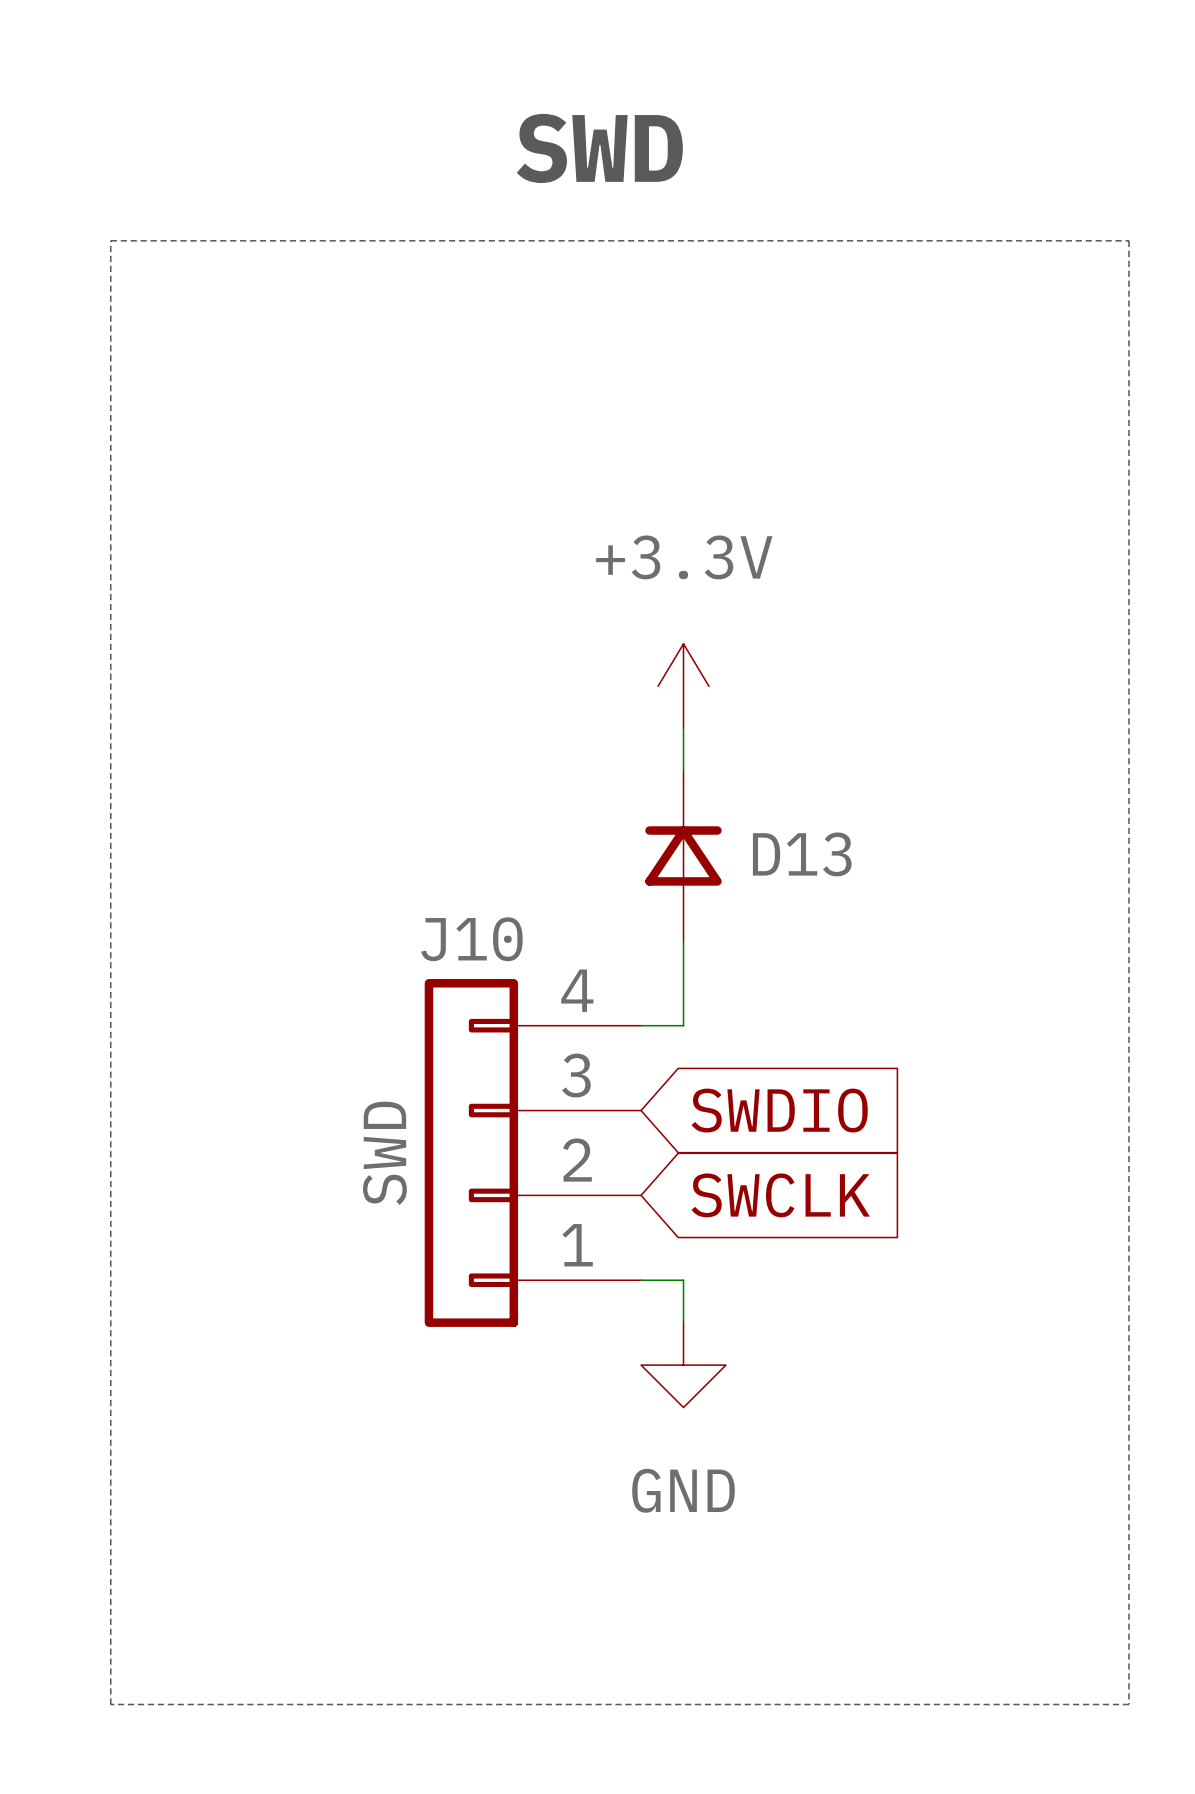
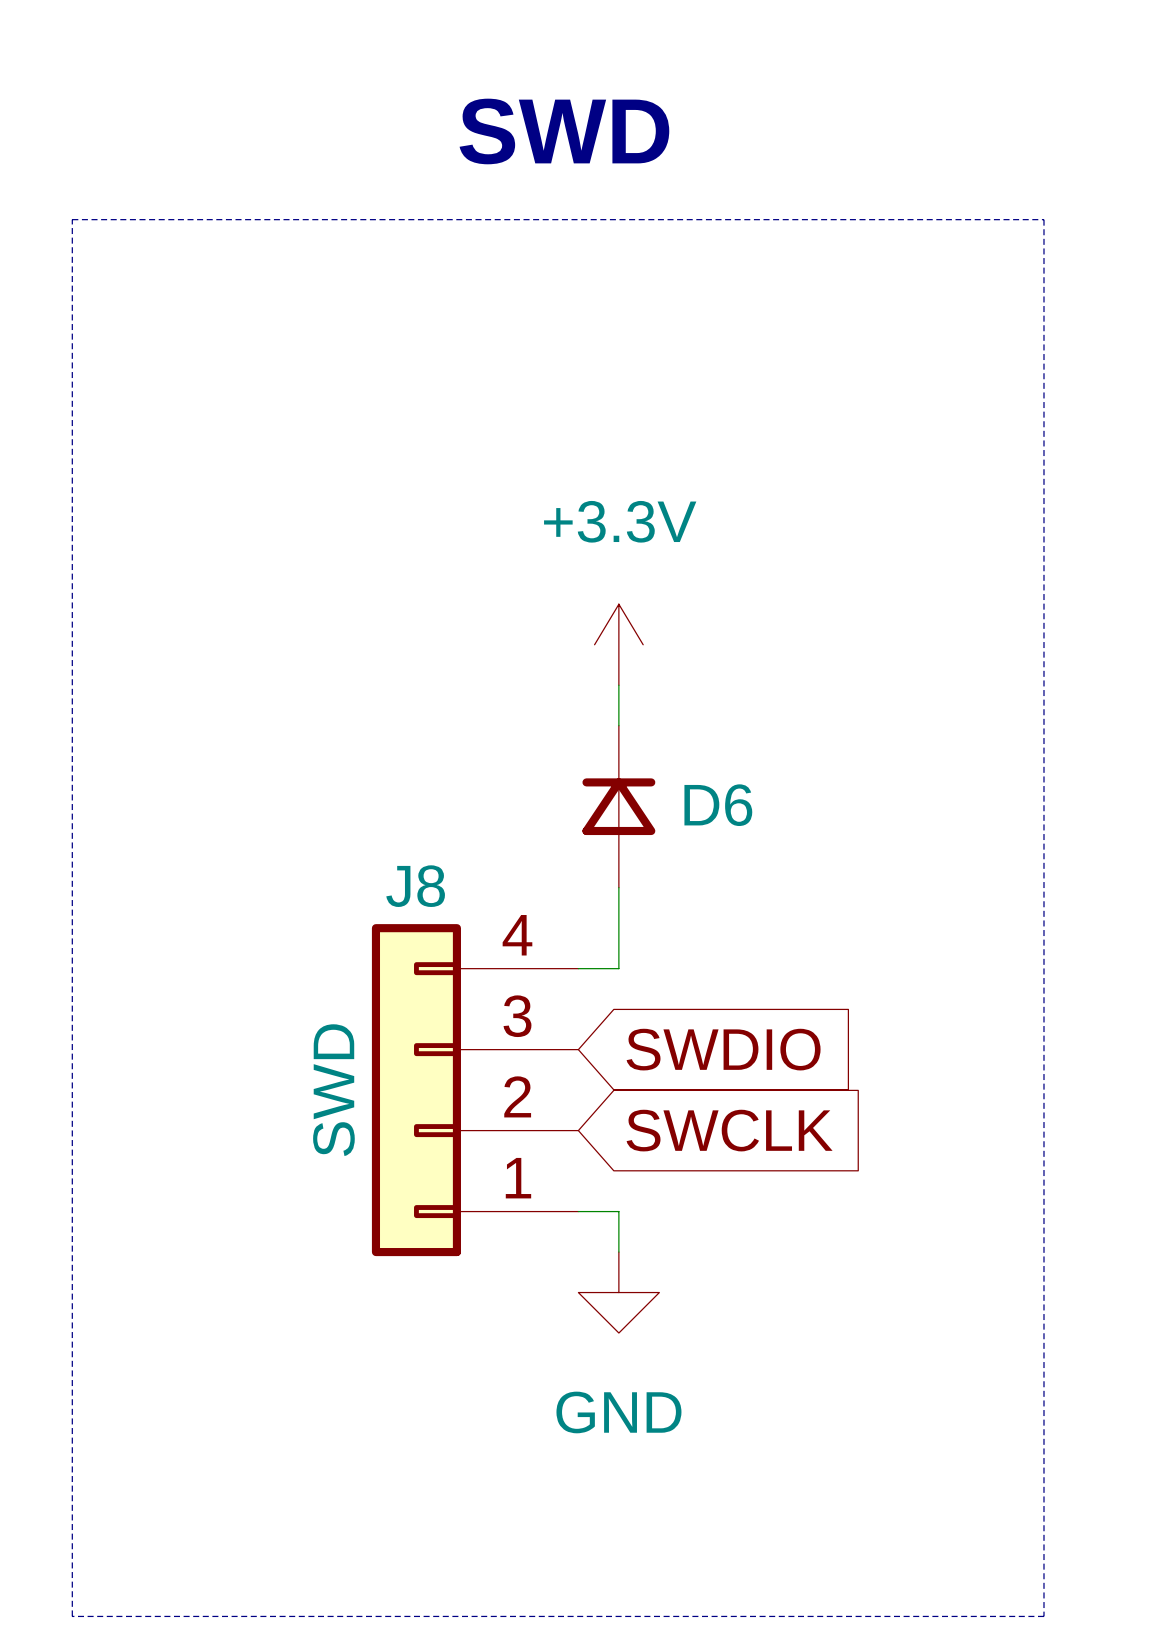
D13 name: D13 (802, 854) -> D6 (718, 805)
J10 name: J10 (471, 939) -> J8 (415, 886)

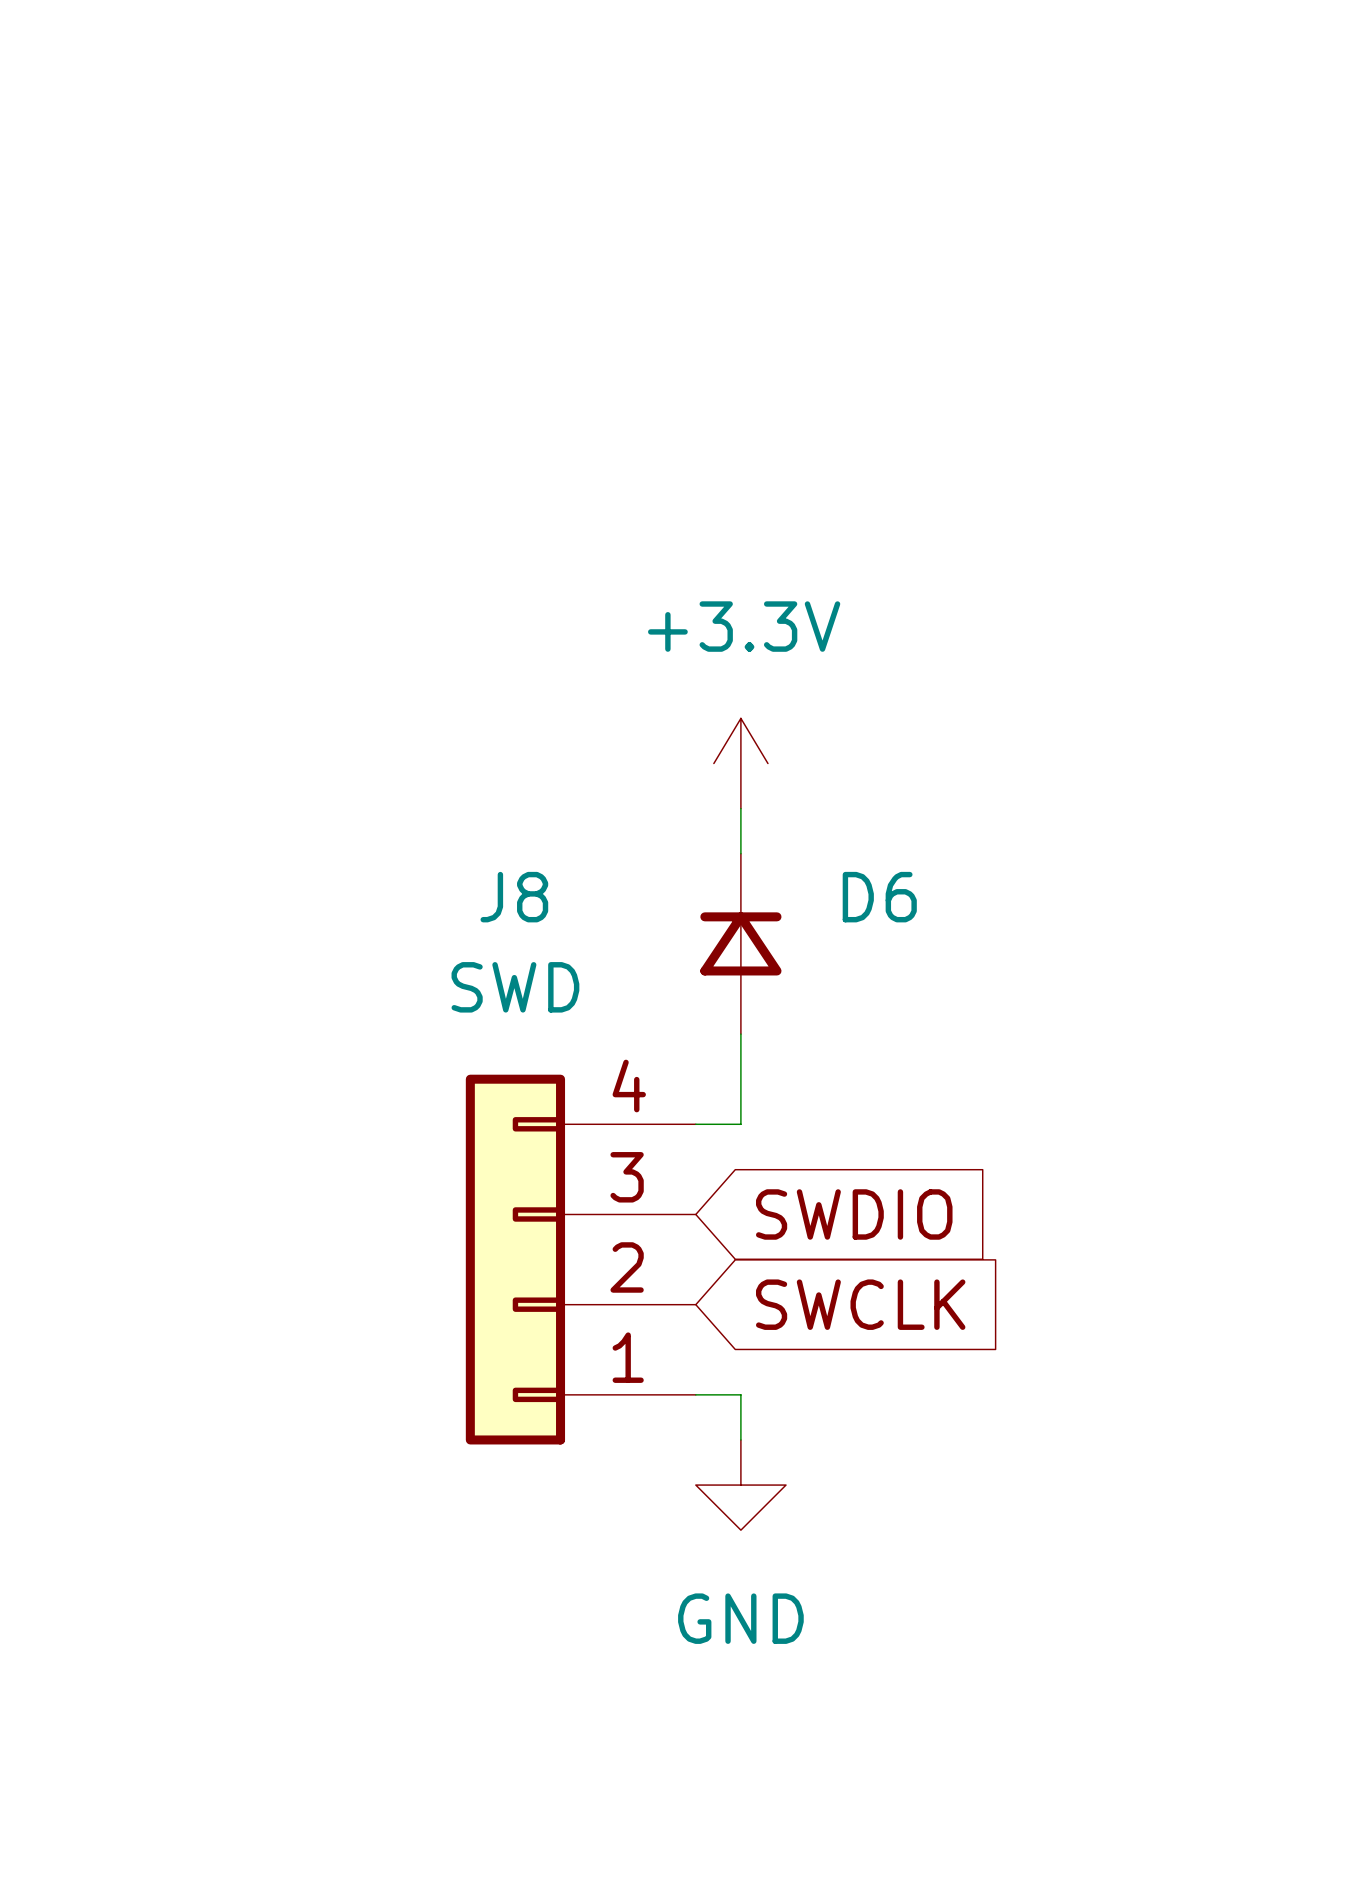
text: SWD (564, 131) -> none
line: (72, 219) (1043, 219) (1043, 1616) (72, 1616) (72, 219) -> none
D6 name position: D6 (718, 805) -> D6 (879, 897)
J8 name position: J8 (415, 886) -> J8 (514, 897)
J8 value rotation: 0° (333, 1090) -> 90° clockwise (515, 987)
J8 value position: SWD (333, 1090) -> SWD (515, 987)

